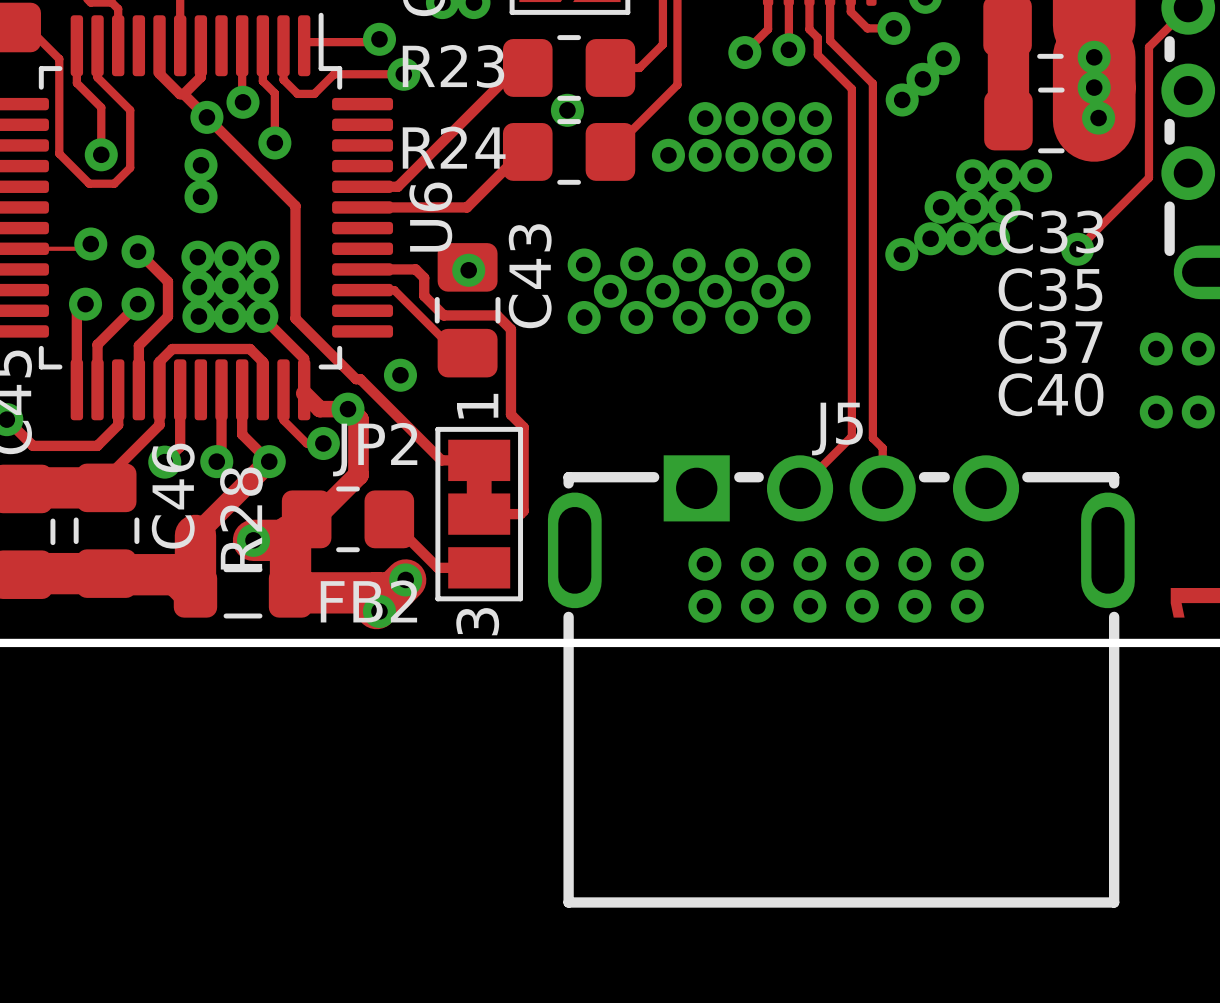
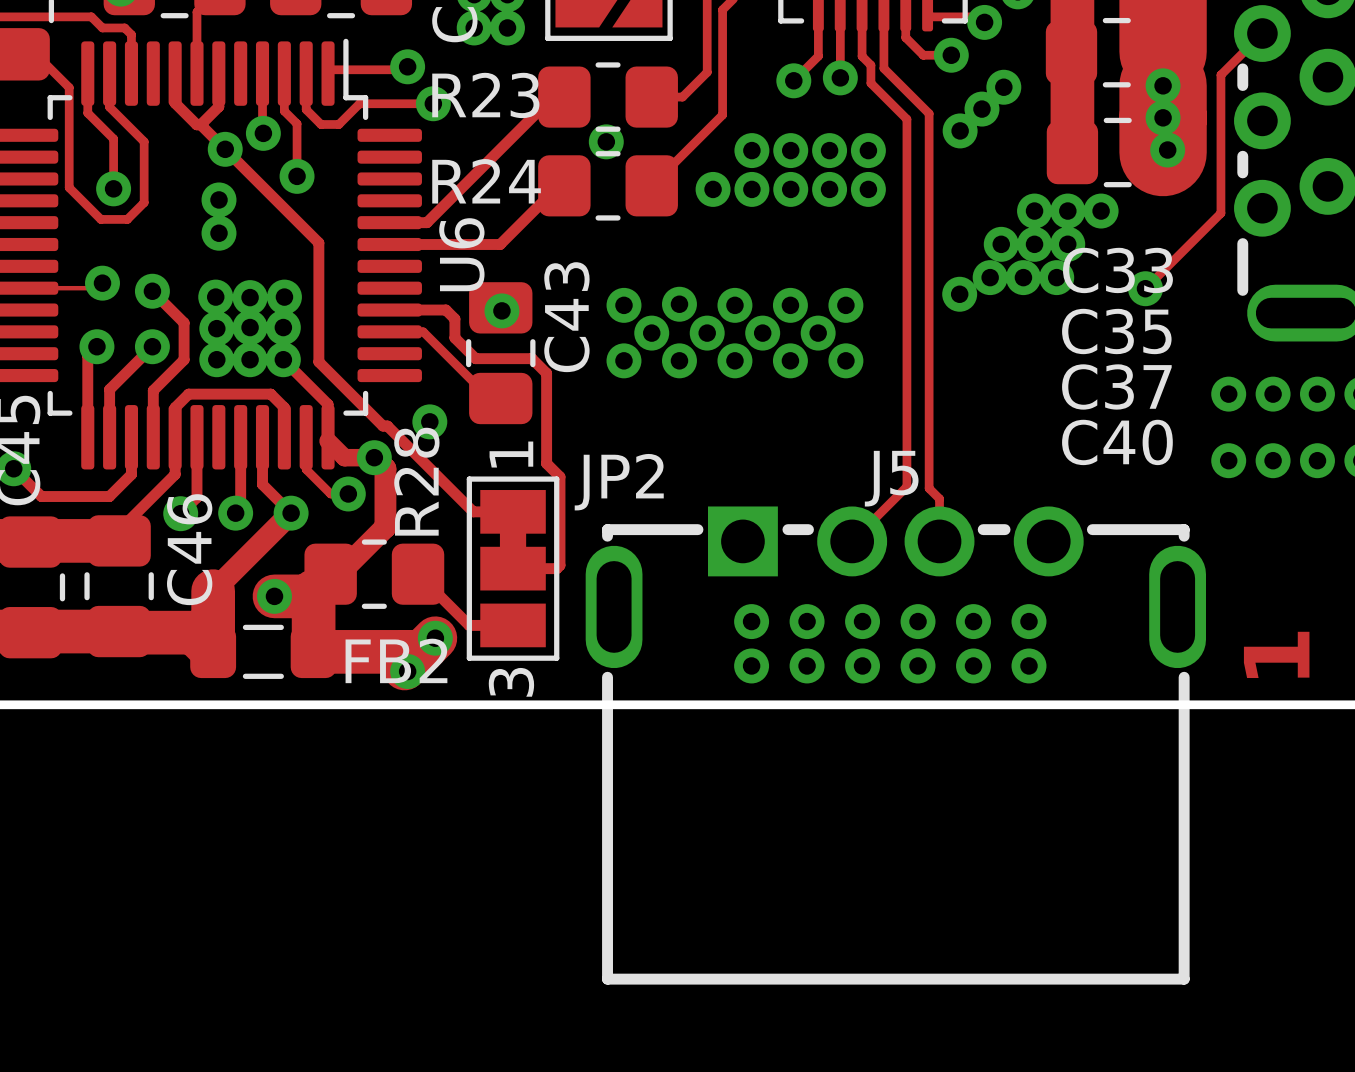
JP2 name position: JP2 (375, 449) -> JP2 (619, 482)
R28 name position: R28 (241, 518) -> R28 (416, 481)

